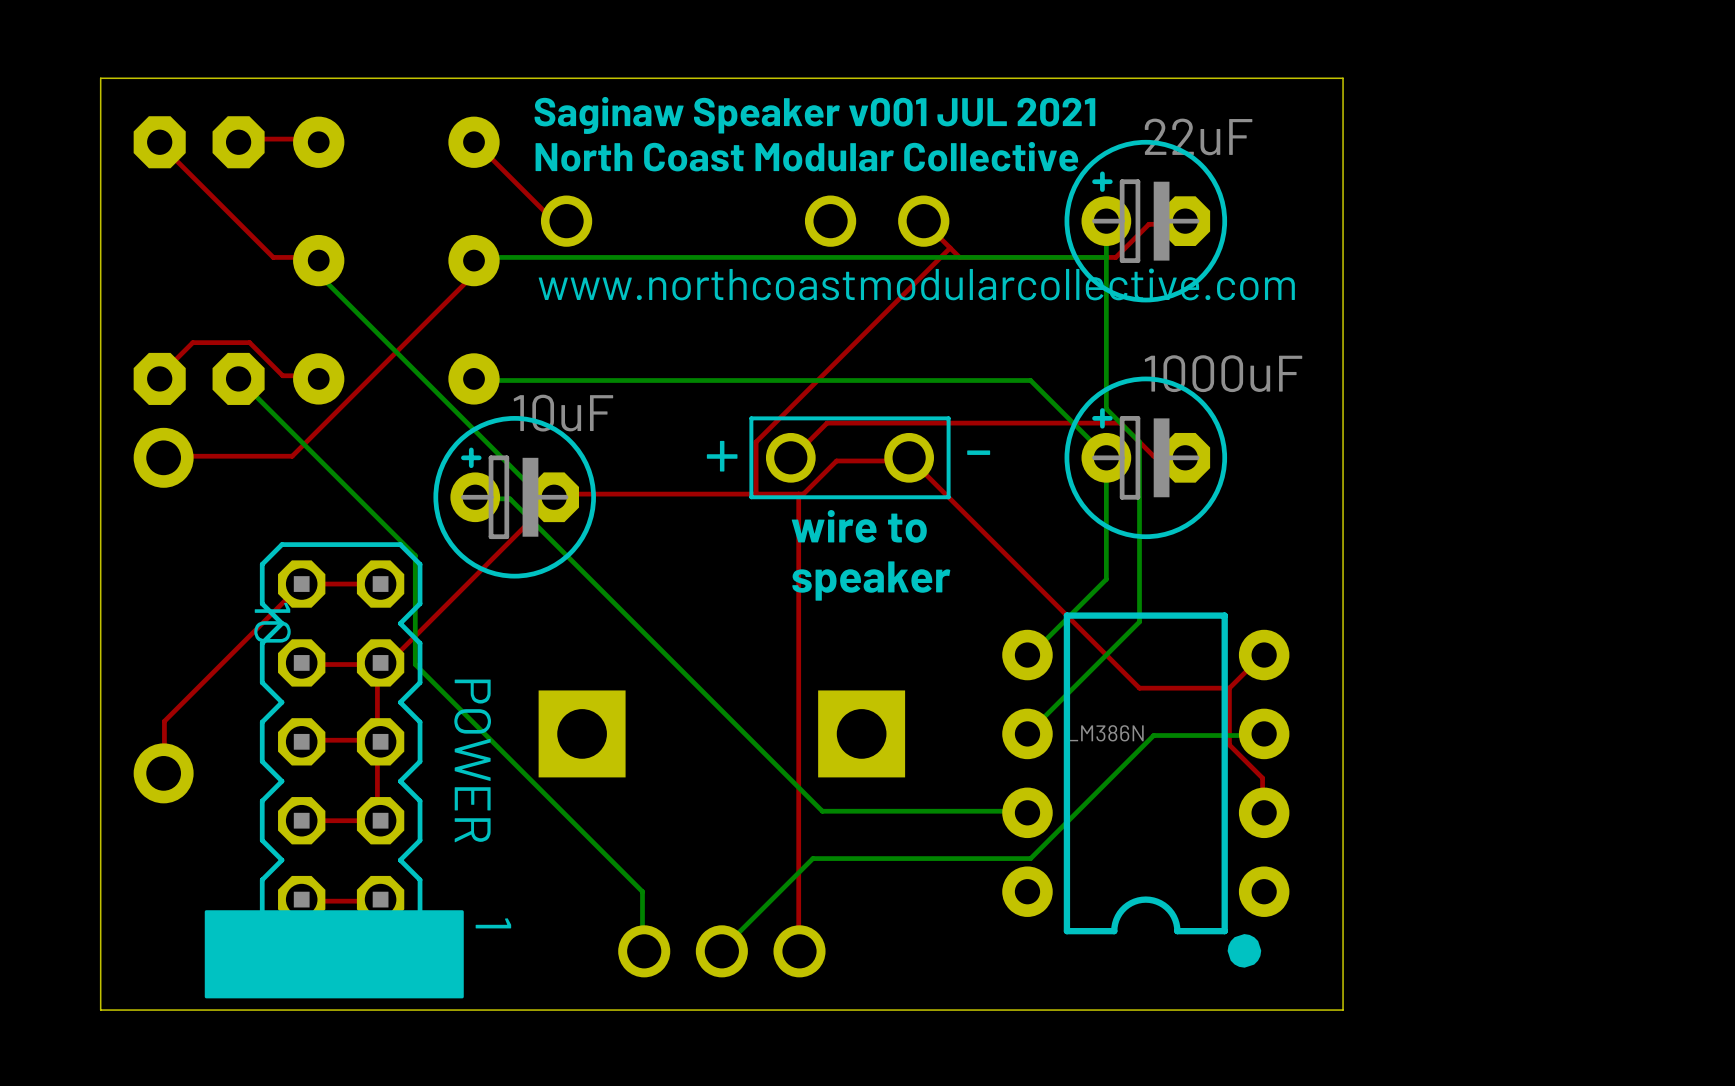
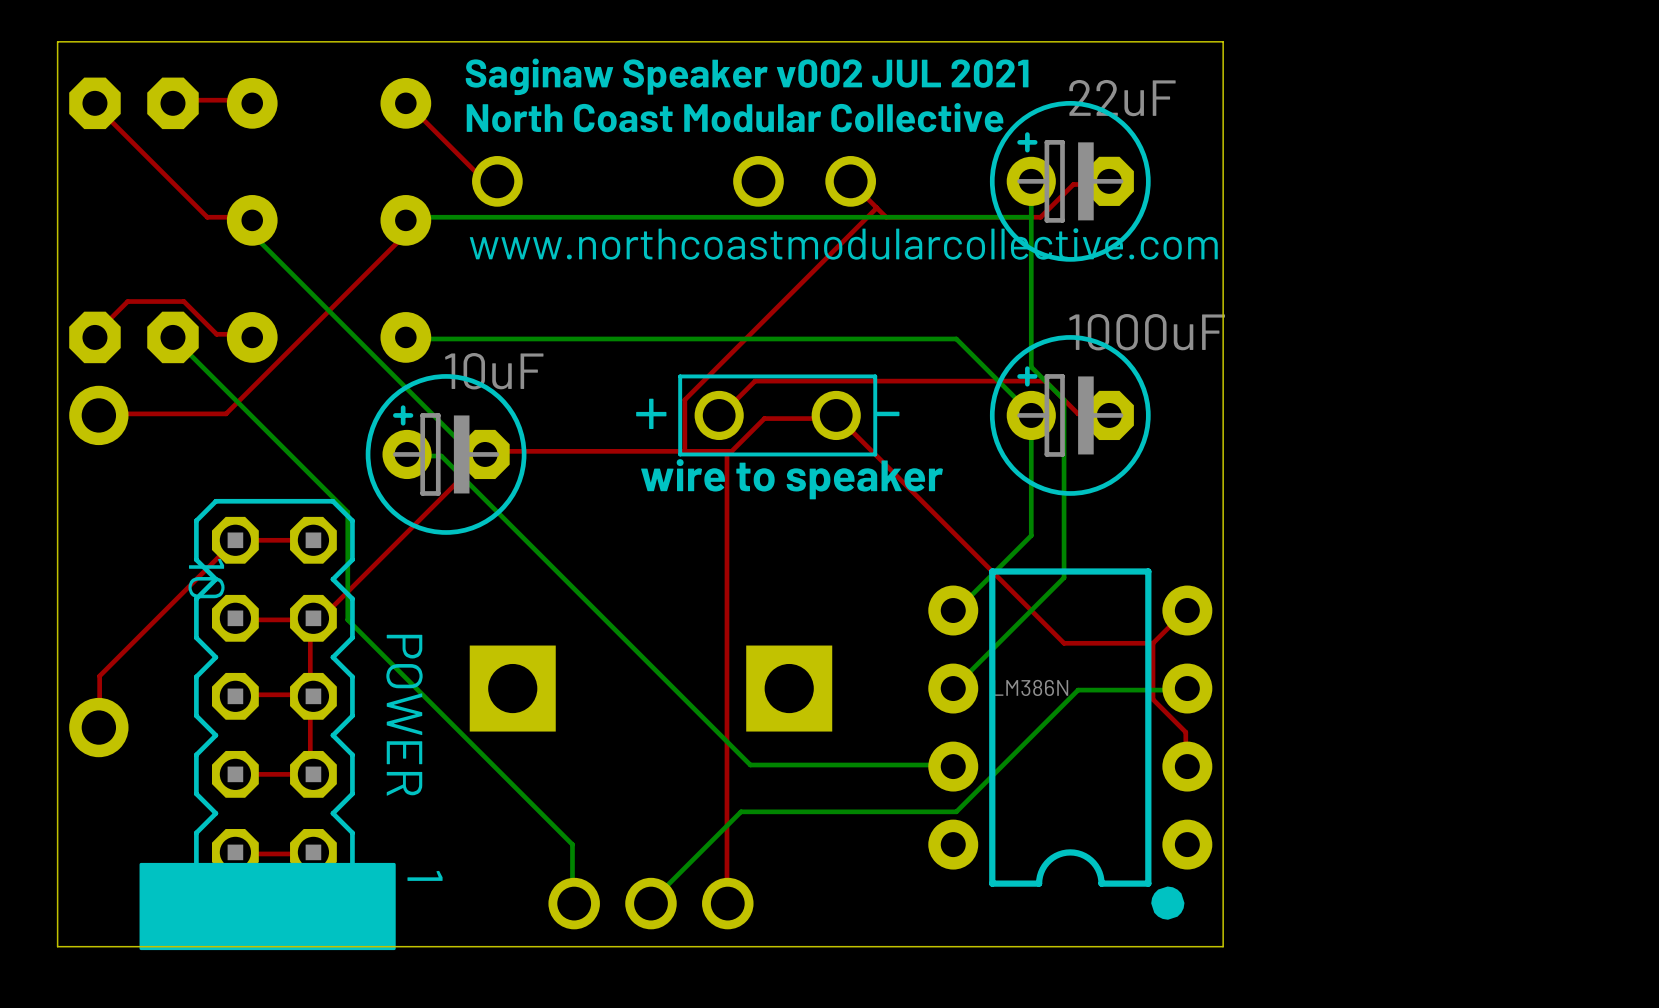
board edge: (1343, 78) (1343, 1010) (100, 1010) (100, 78) (1343, 78) -> (1223, 41) (1223, 946) (57, 946) (57, 41) (1223, 41)
text: Saginaw Speaker v001 JUL 2021 (814, 115) -> Saginaw Speaker v002 JUL 2021 (747, 76)
text position: - (978, 452) -> - (888, 413)
text: none -> wire to speaker (792, 479)
text: wire to (859, 526) -> none
text: speaker (871, 581) -> none

